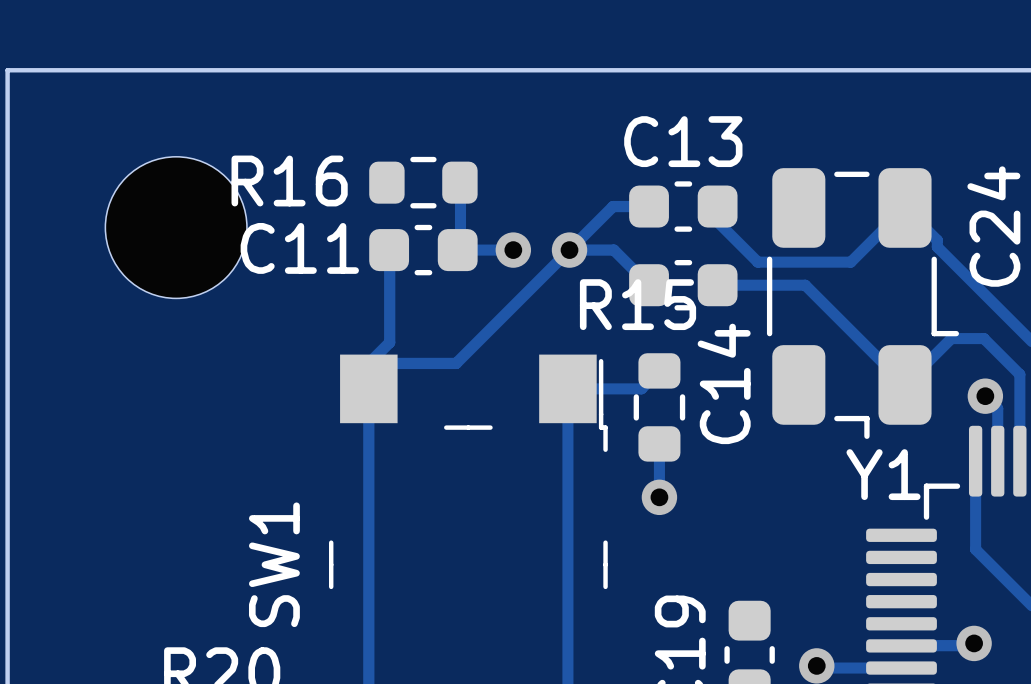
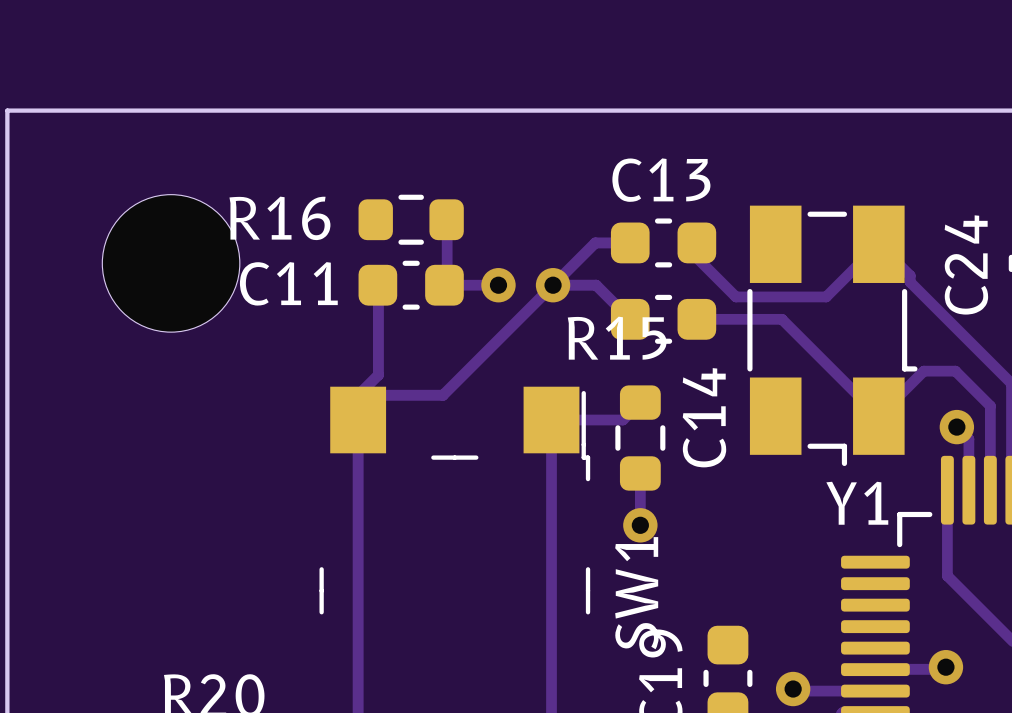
Y1 footprint: [766, 168, 959, 439] -> [747, 205, 918, 467]
SW1 name position: SW1 (274, 564) -> SW1 (636, 593)

